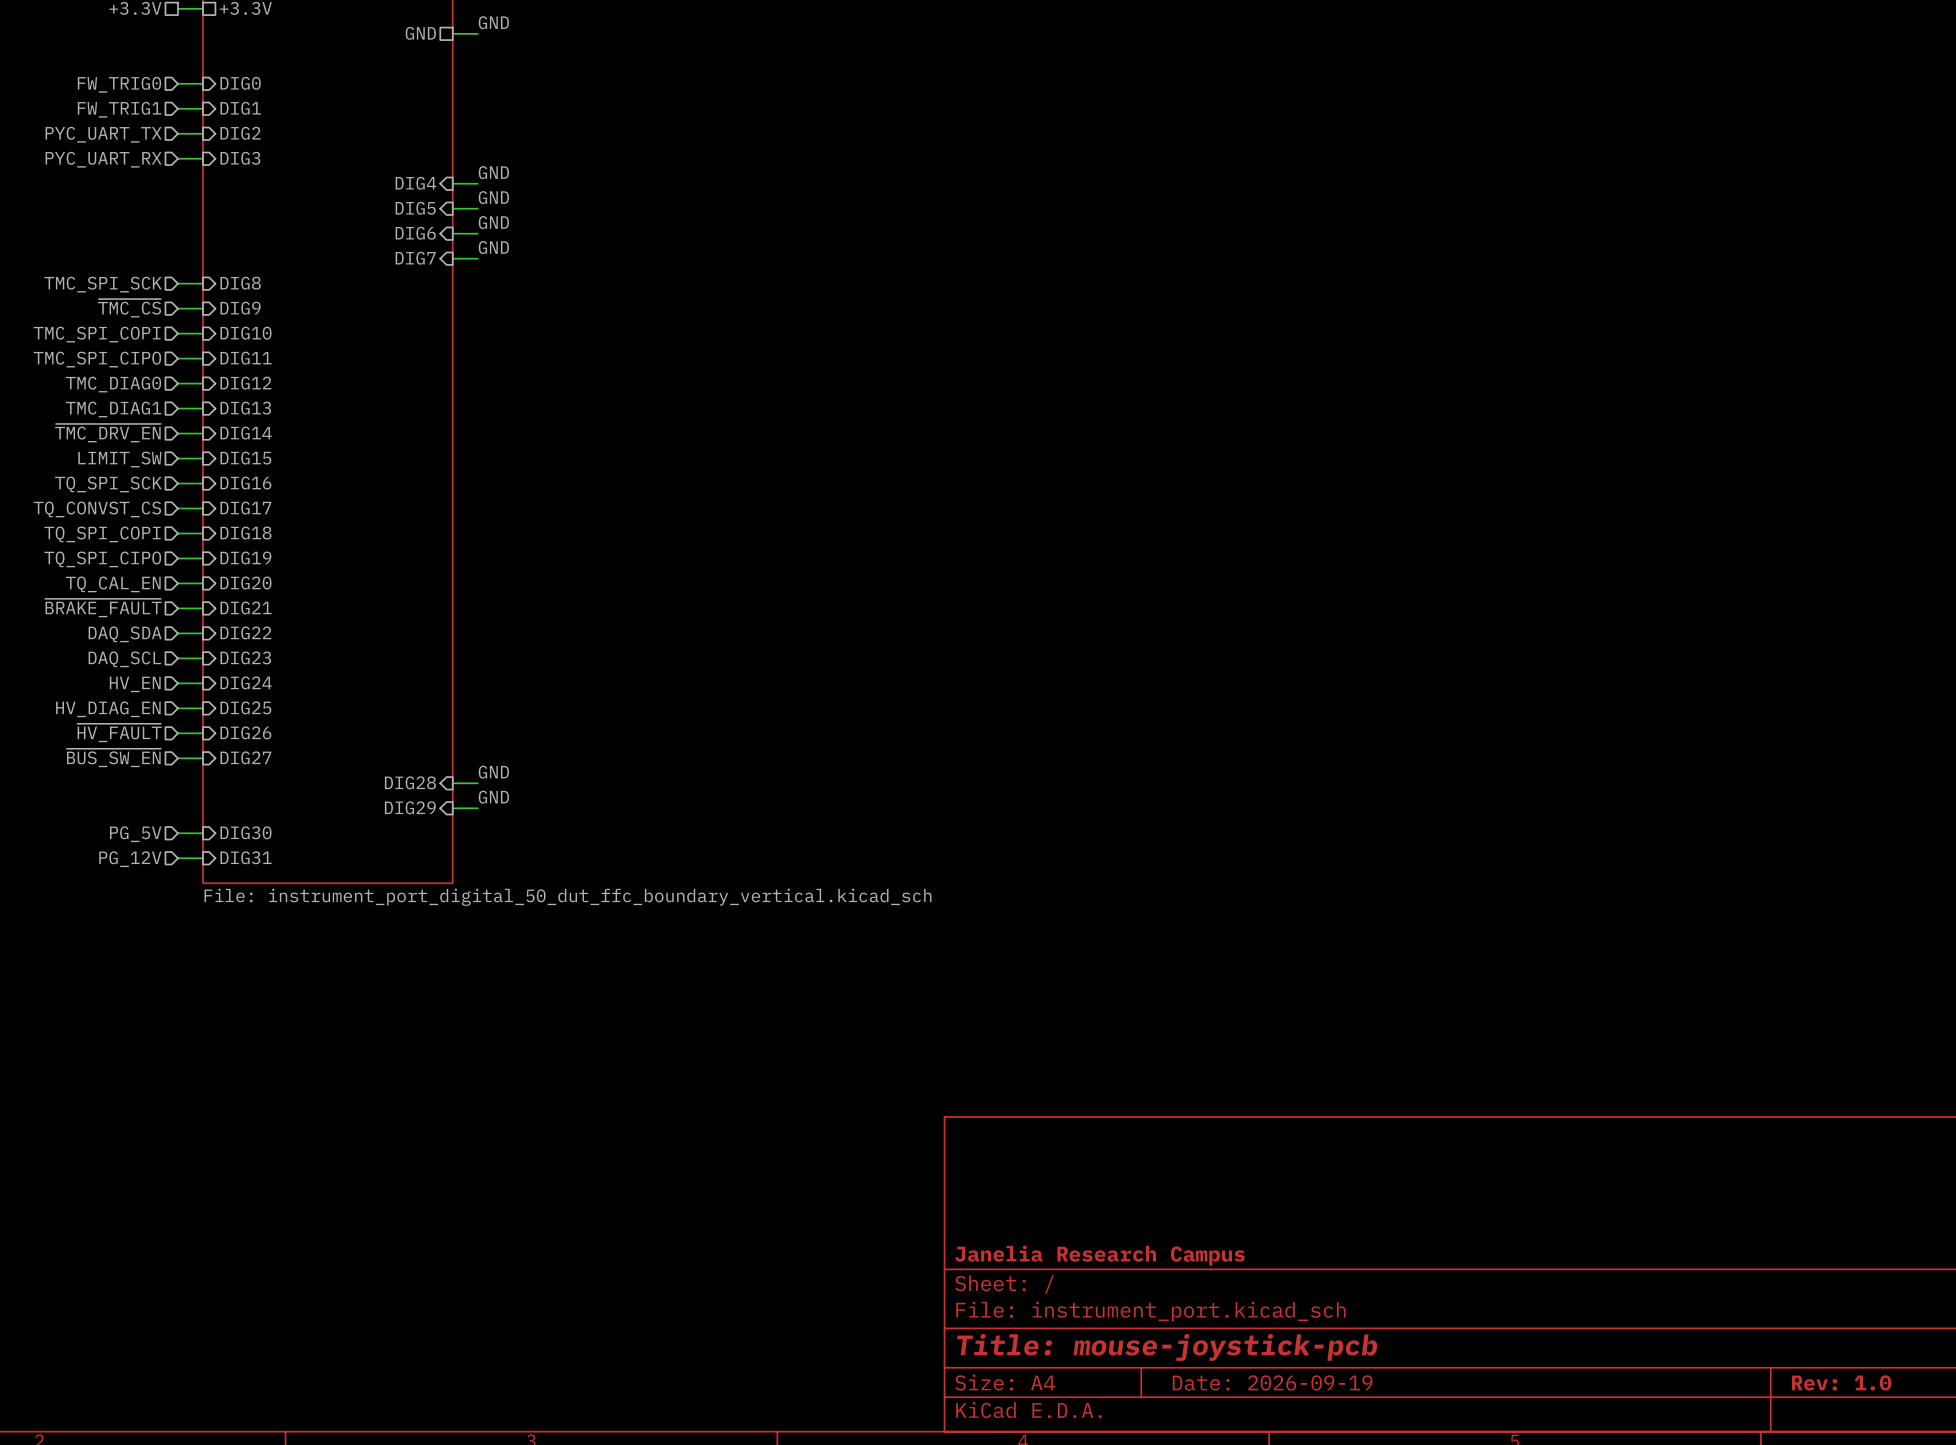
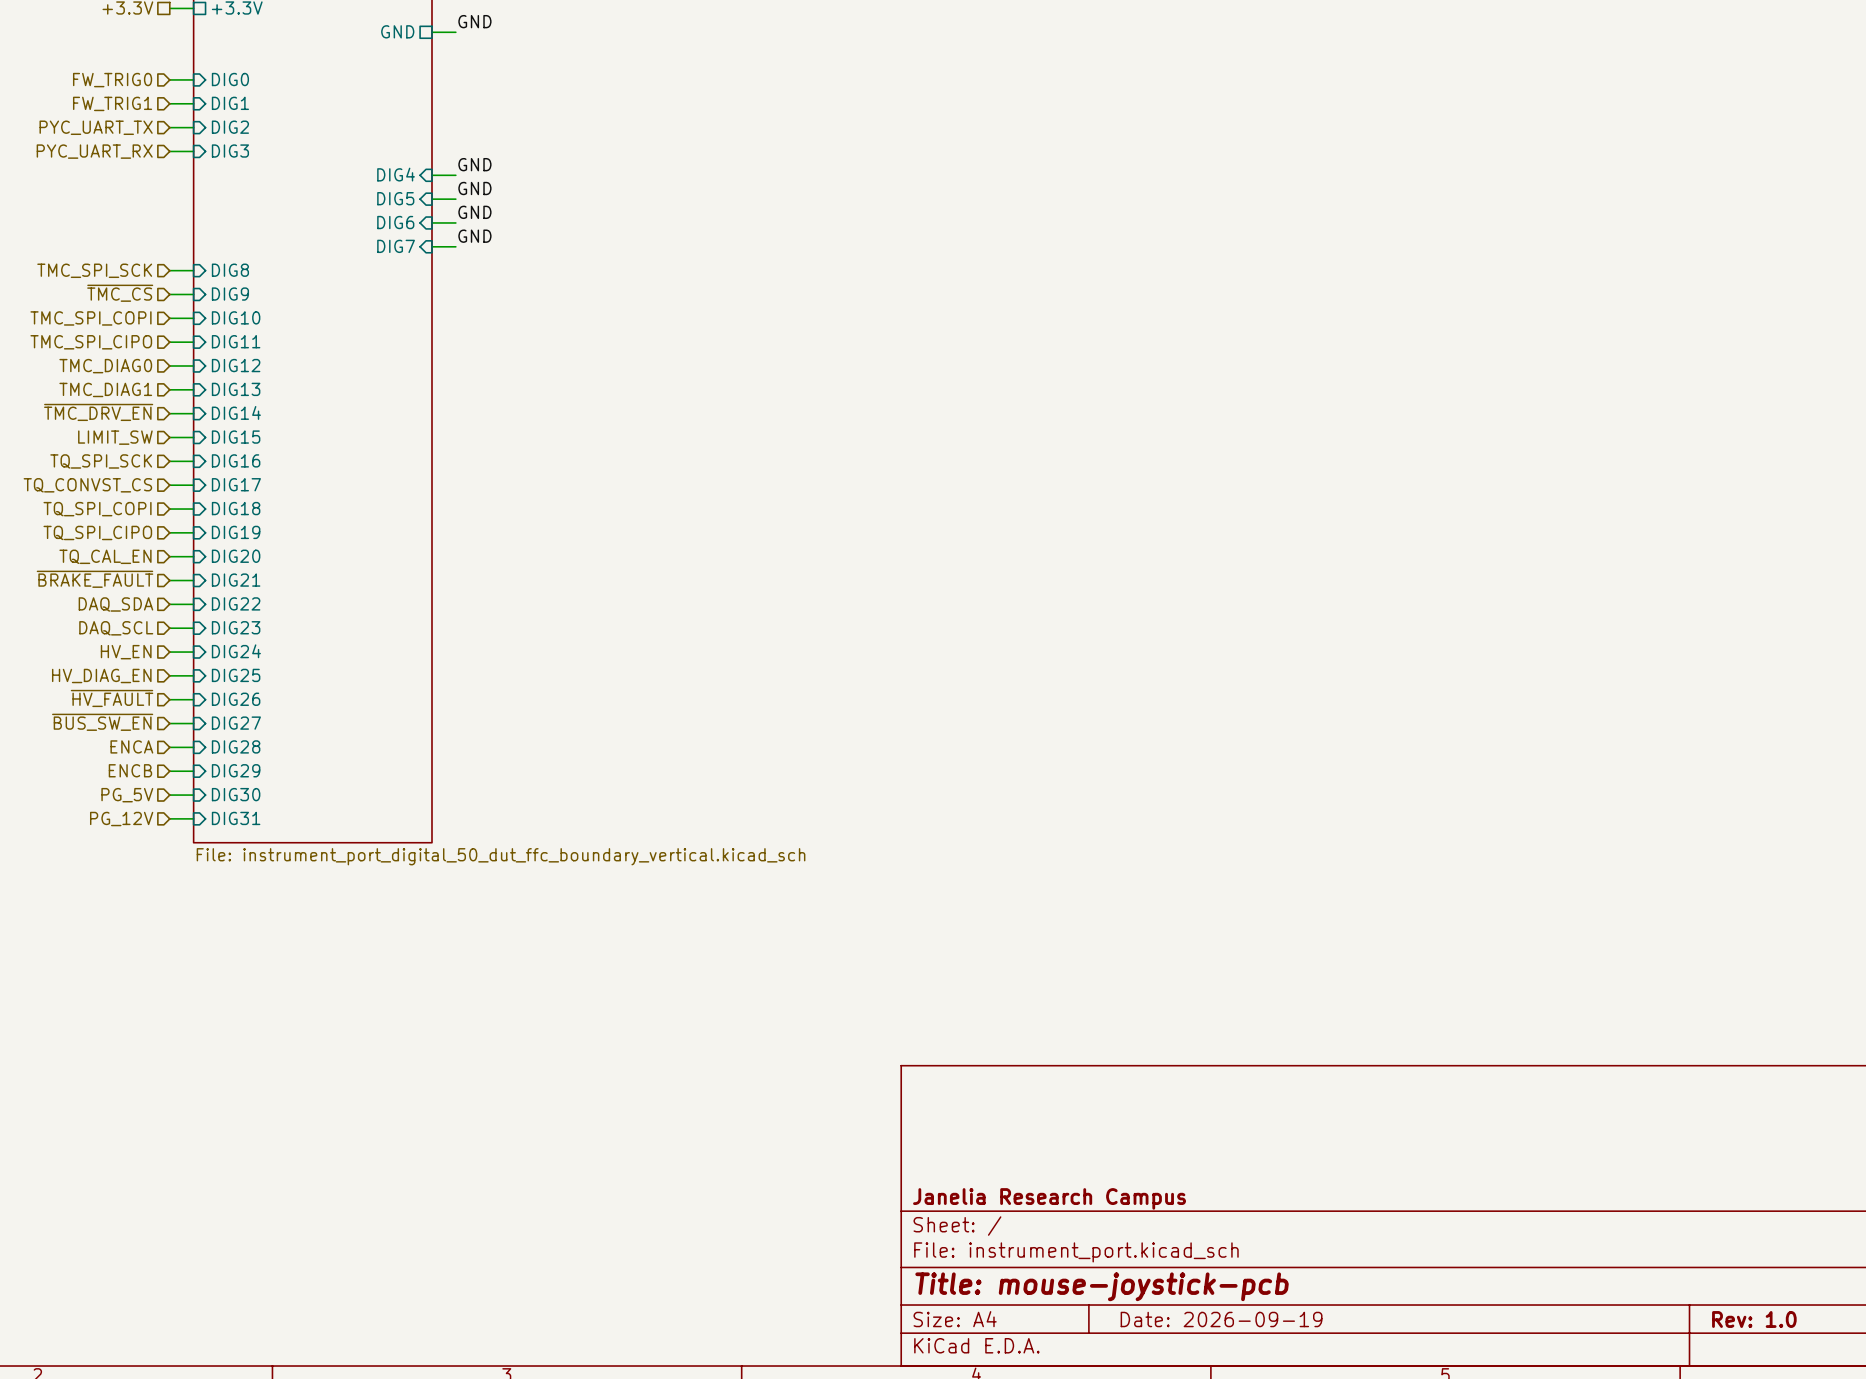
label: GND (493, 772) -> none
hierarchical label: none -> ENCA (131, 746)
sheet pin rotation: 0° (410, 782) -> 180° (236, 746)
sheet pin position: DIG28 (410, 782) -> DIG28 (236, 746)
wire: none -> (169, 747) (193, 747)
wire: (452, 783) (477, 783) -> none
label: GND (493, 797) -> none
hierarchical label: none -> ENCB (130, 770)
sheet pin rotation: 0° (410, 807) -> 180° (236, 770)
sheet pin position: DIG29 (410, 807) -> DIG29 (236, 770)
wire: none -> (169, 771) (193, 771)
wire: (452, 808) (477, 808) -> none

